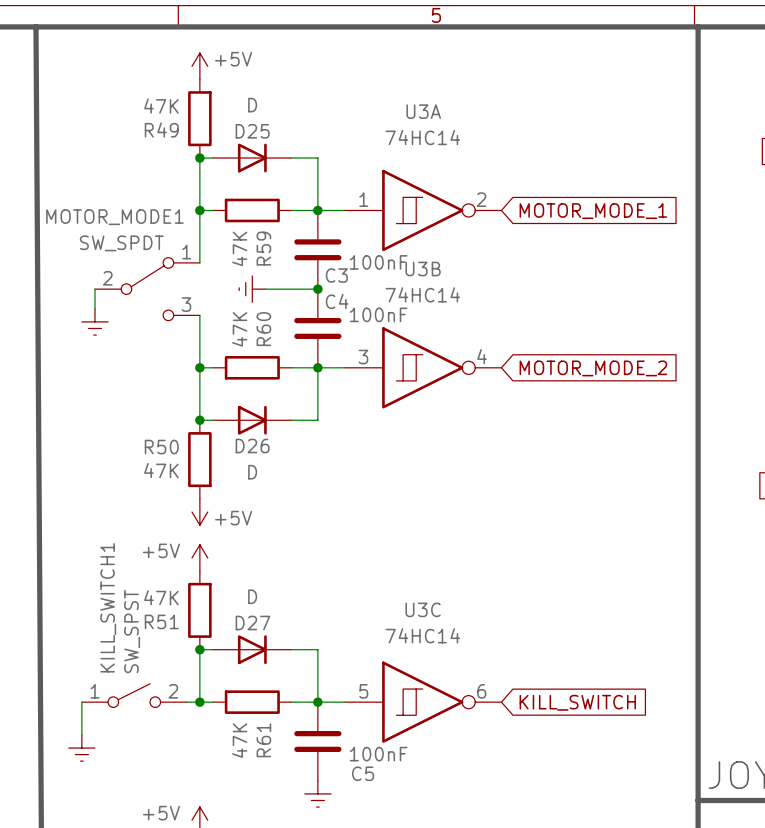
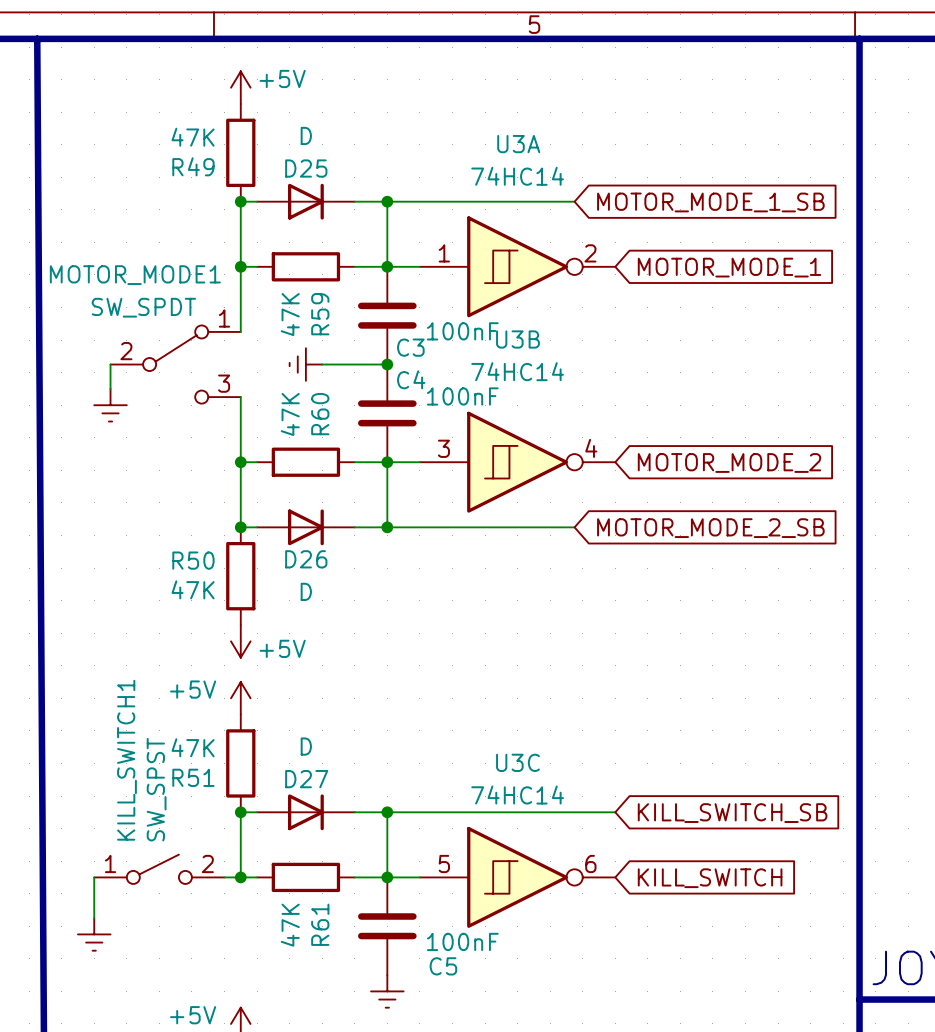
wire: none -> (387, 201) (574, 201)
junction: none -> (387, 201)
global label: none -> MOTOR_MODE_1_SB (710, 202)
wire: none -> (387, 527) (574, 527)
junction: none -> (387, 527)
global label: none -> MOTOR_MODE_2_SB (710, 528)
wire: none -> (387, 812) (615, 812)
junction: none -> (387, 812)
global label: none -> KILL_SWITCH_SB (732, 813)

